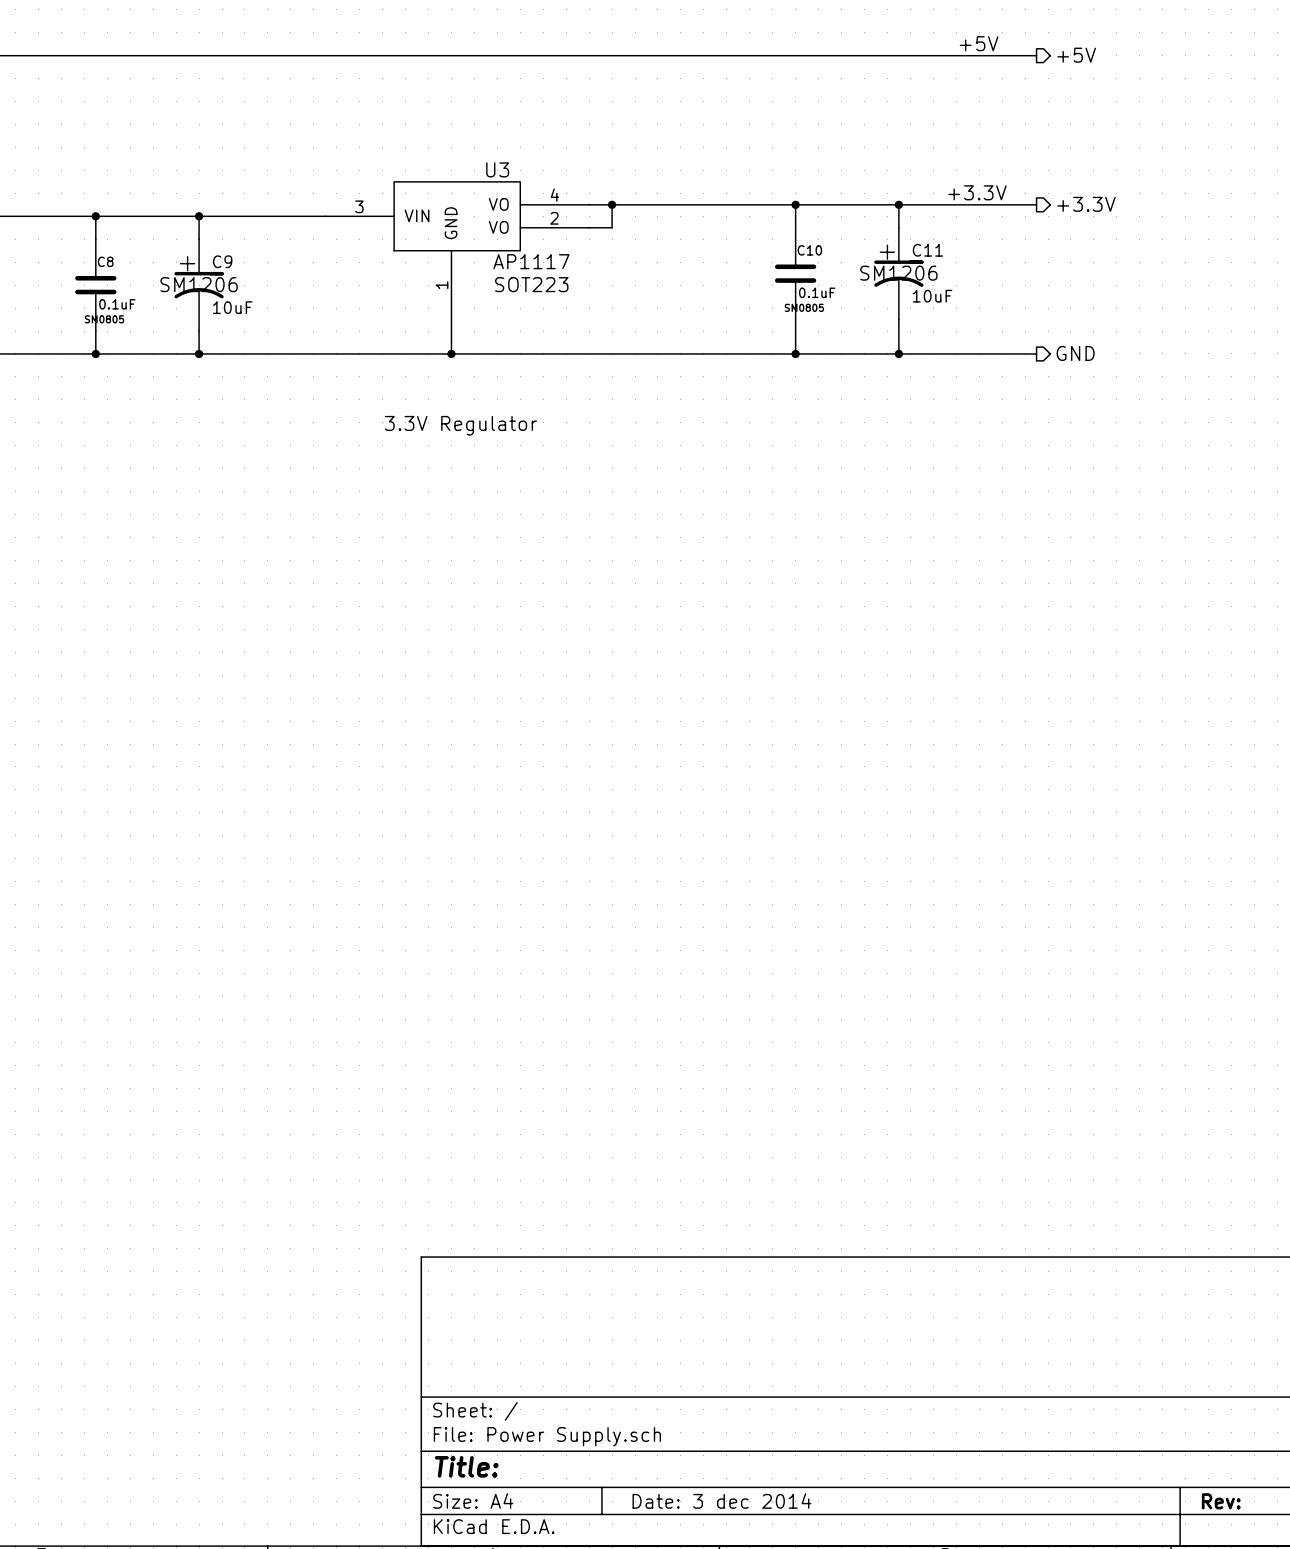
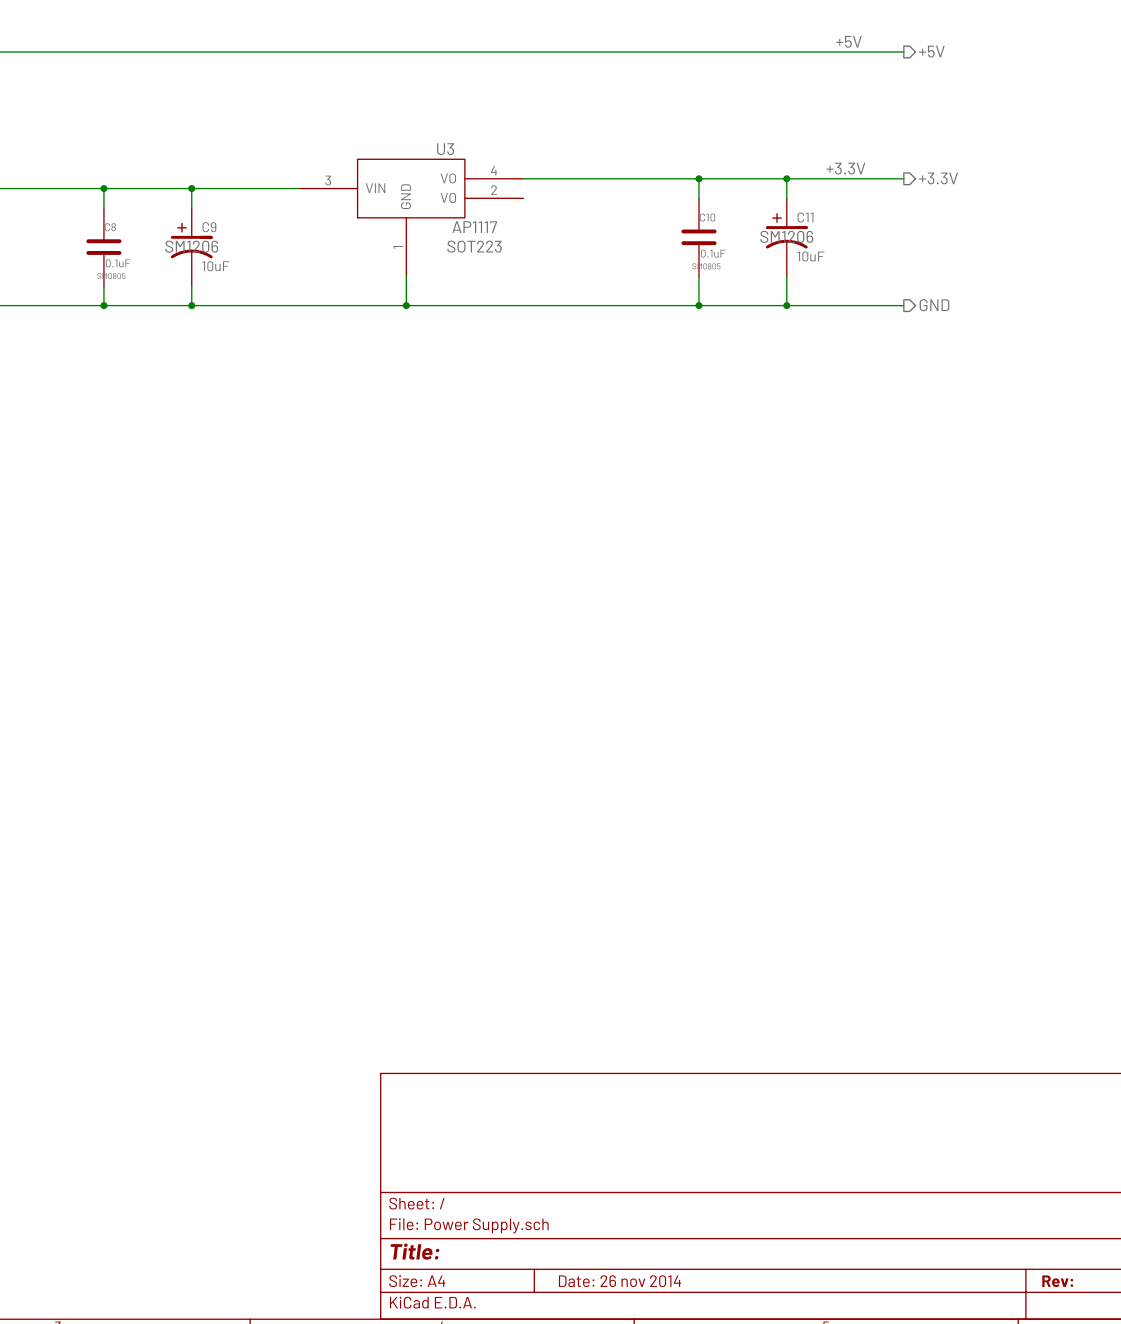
wire: (612, 204) (612, 227) (589, 227) -> none
junction: (612, 204) -> none
text: 3.3V Regulator (460, 425) -> none
title block: Date: 3 dec 2014 (721, 1501) -> Date: 26 nov 2014 (619, 1281)

